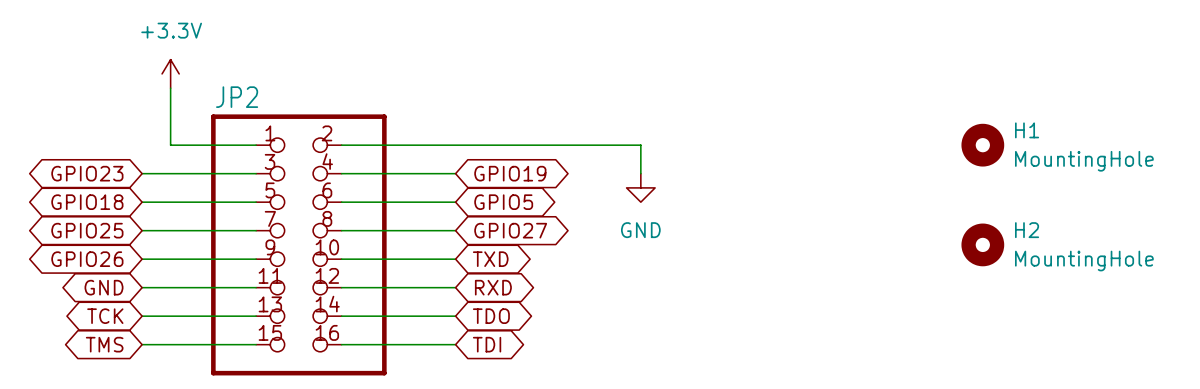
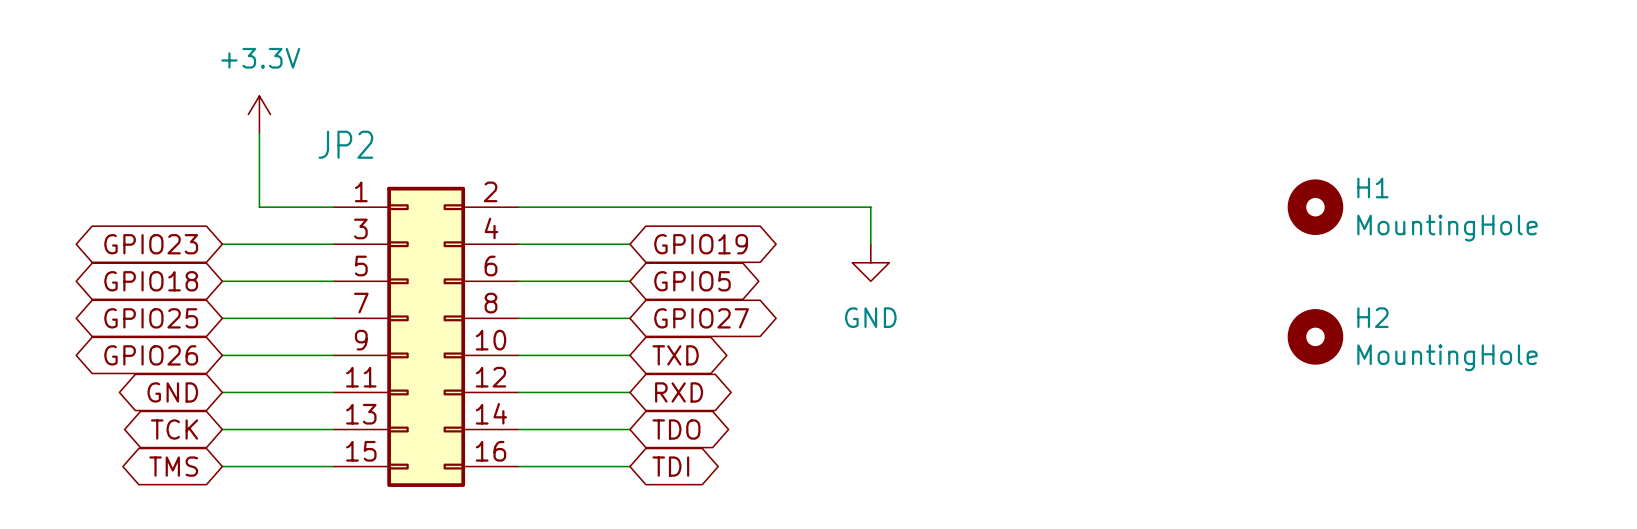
JP2 symbol: [211, 114, 387, 376] -> [333, 186, 519, 487]

